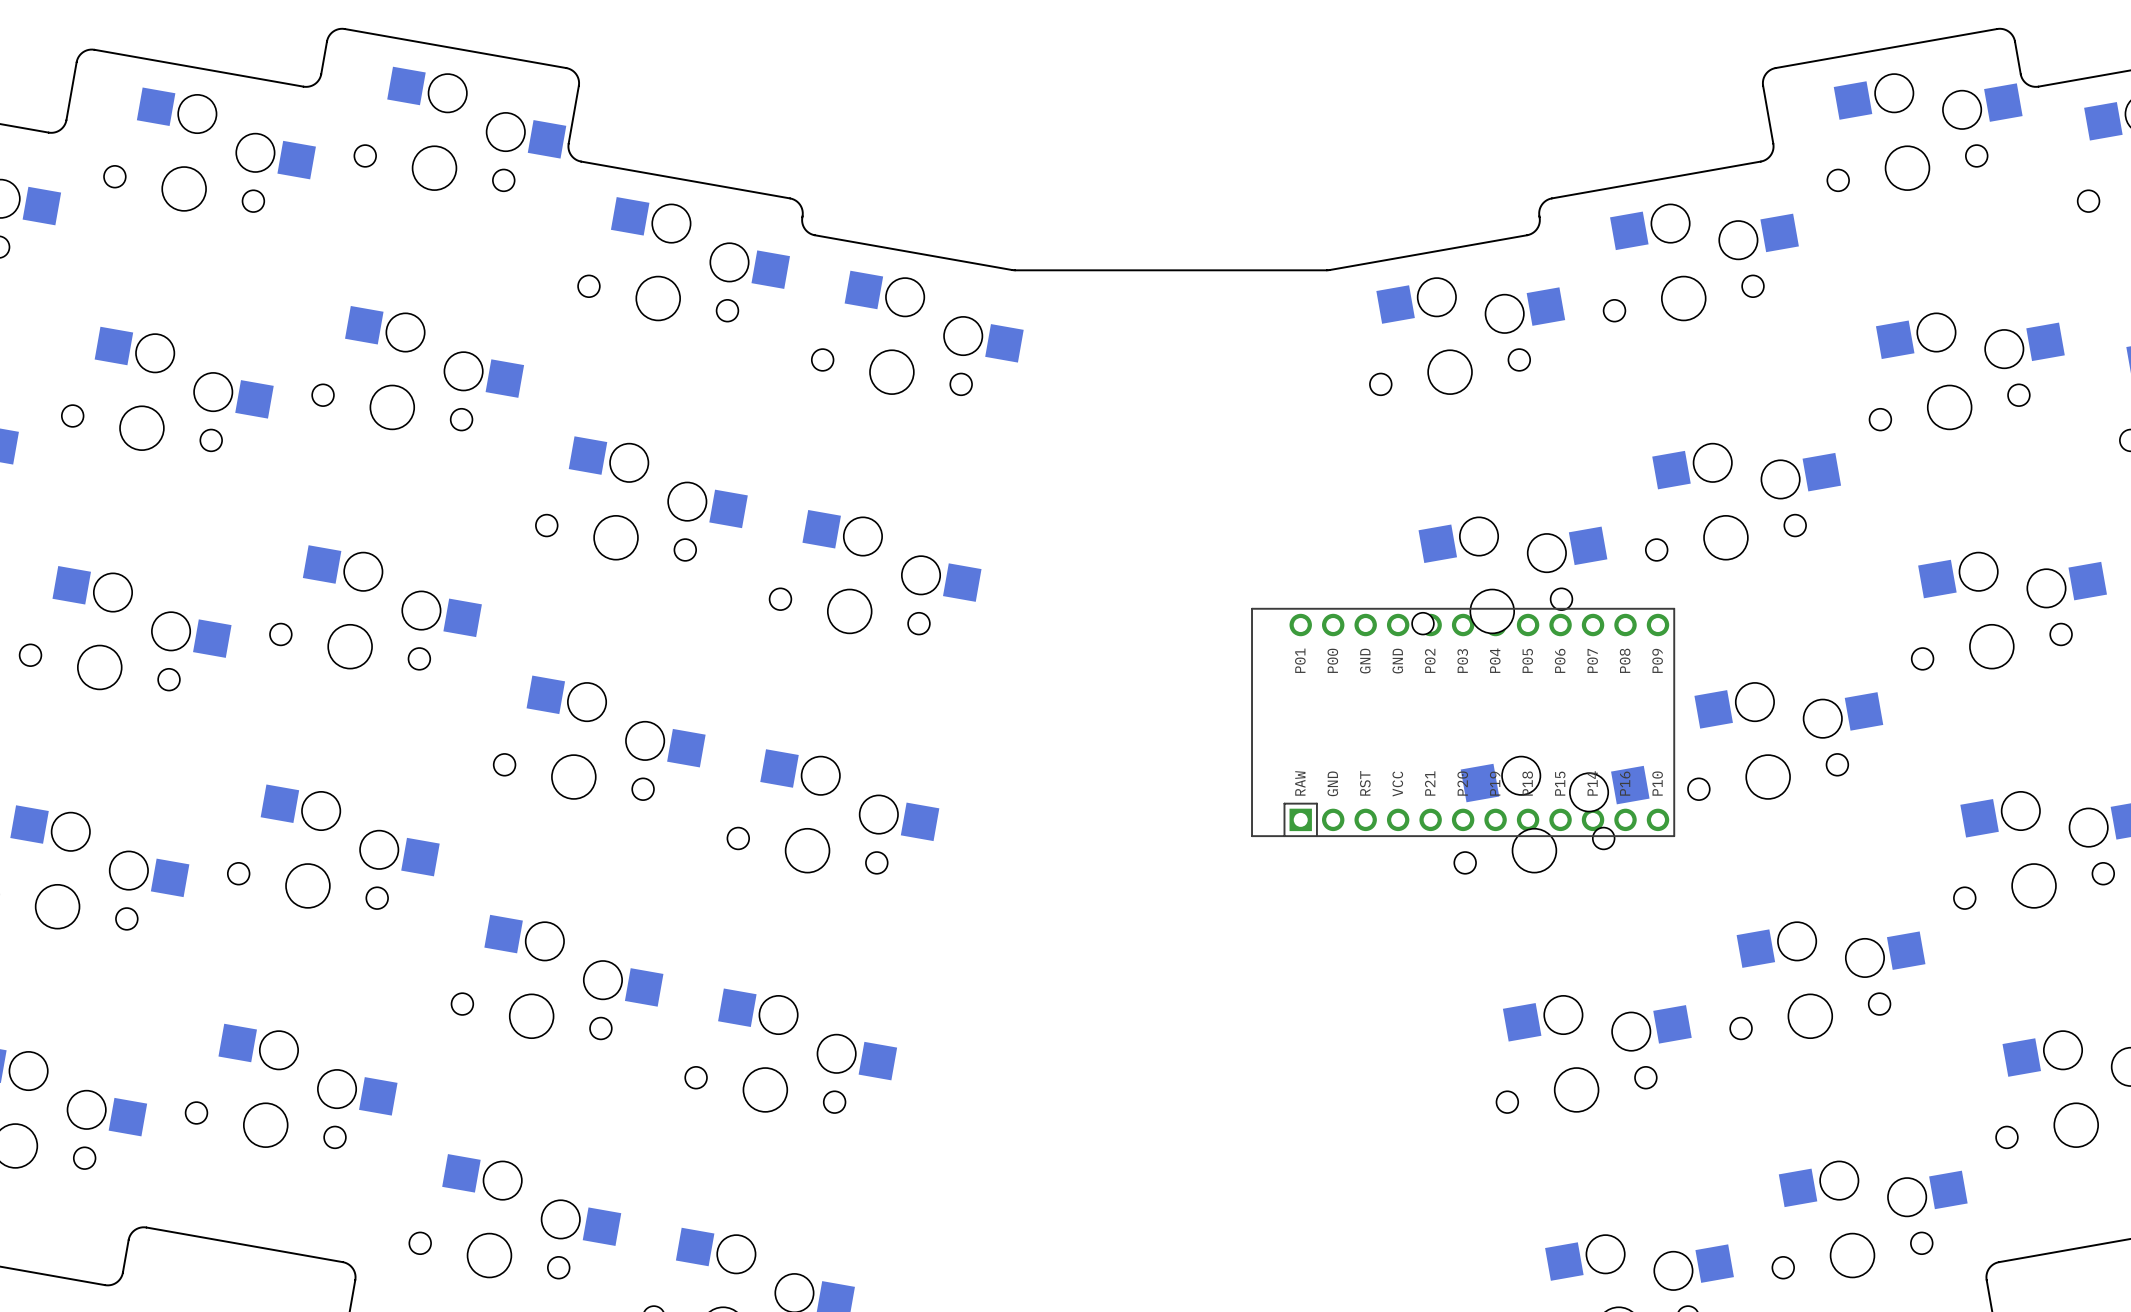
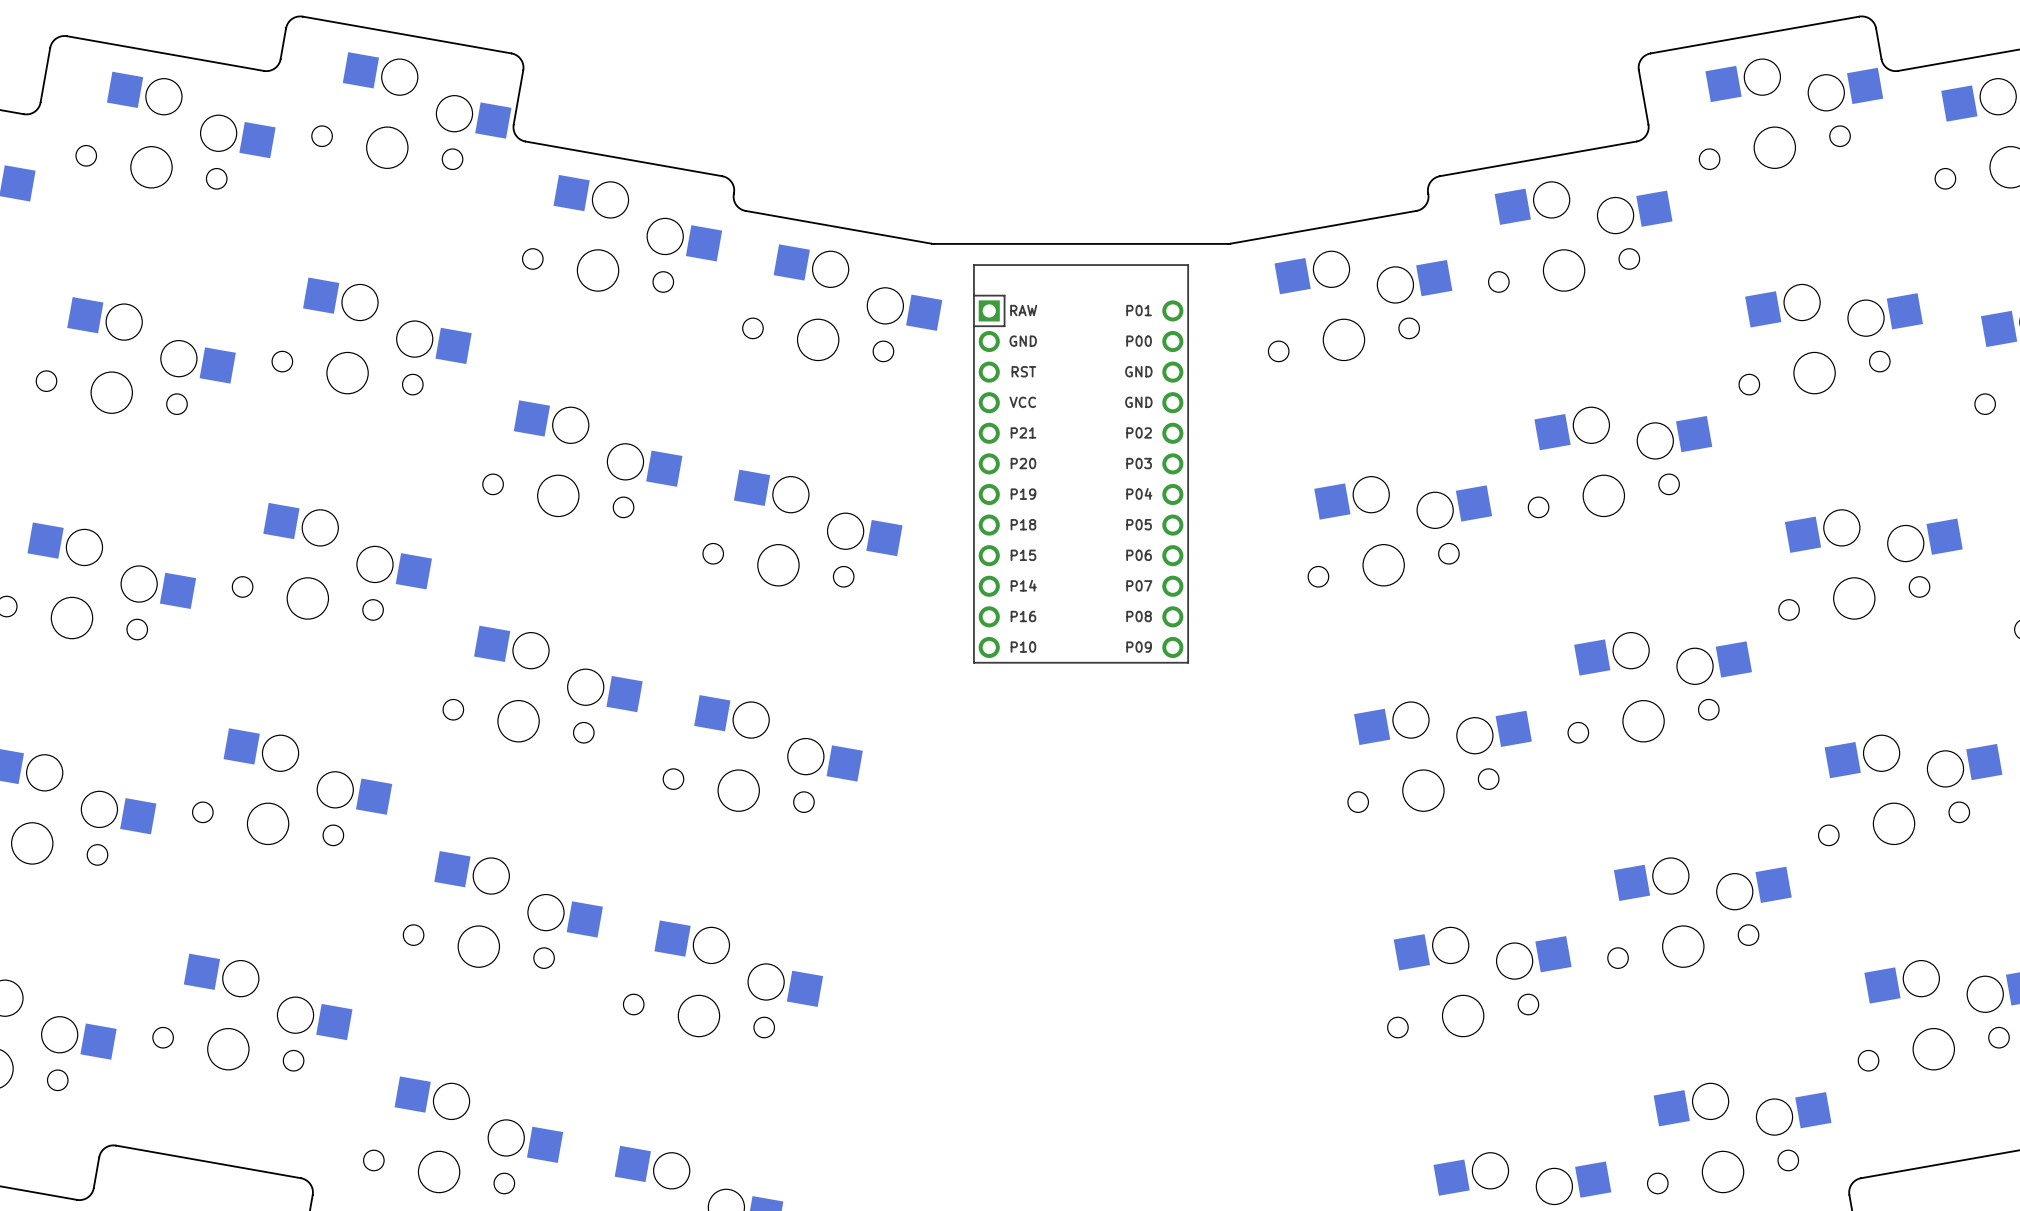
part: none -> (1081, 463)
part: (1463, 722) -> none

